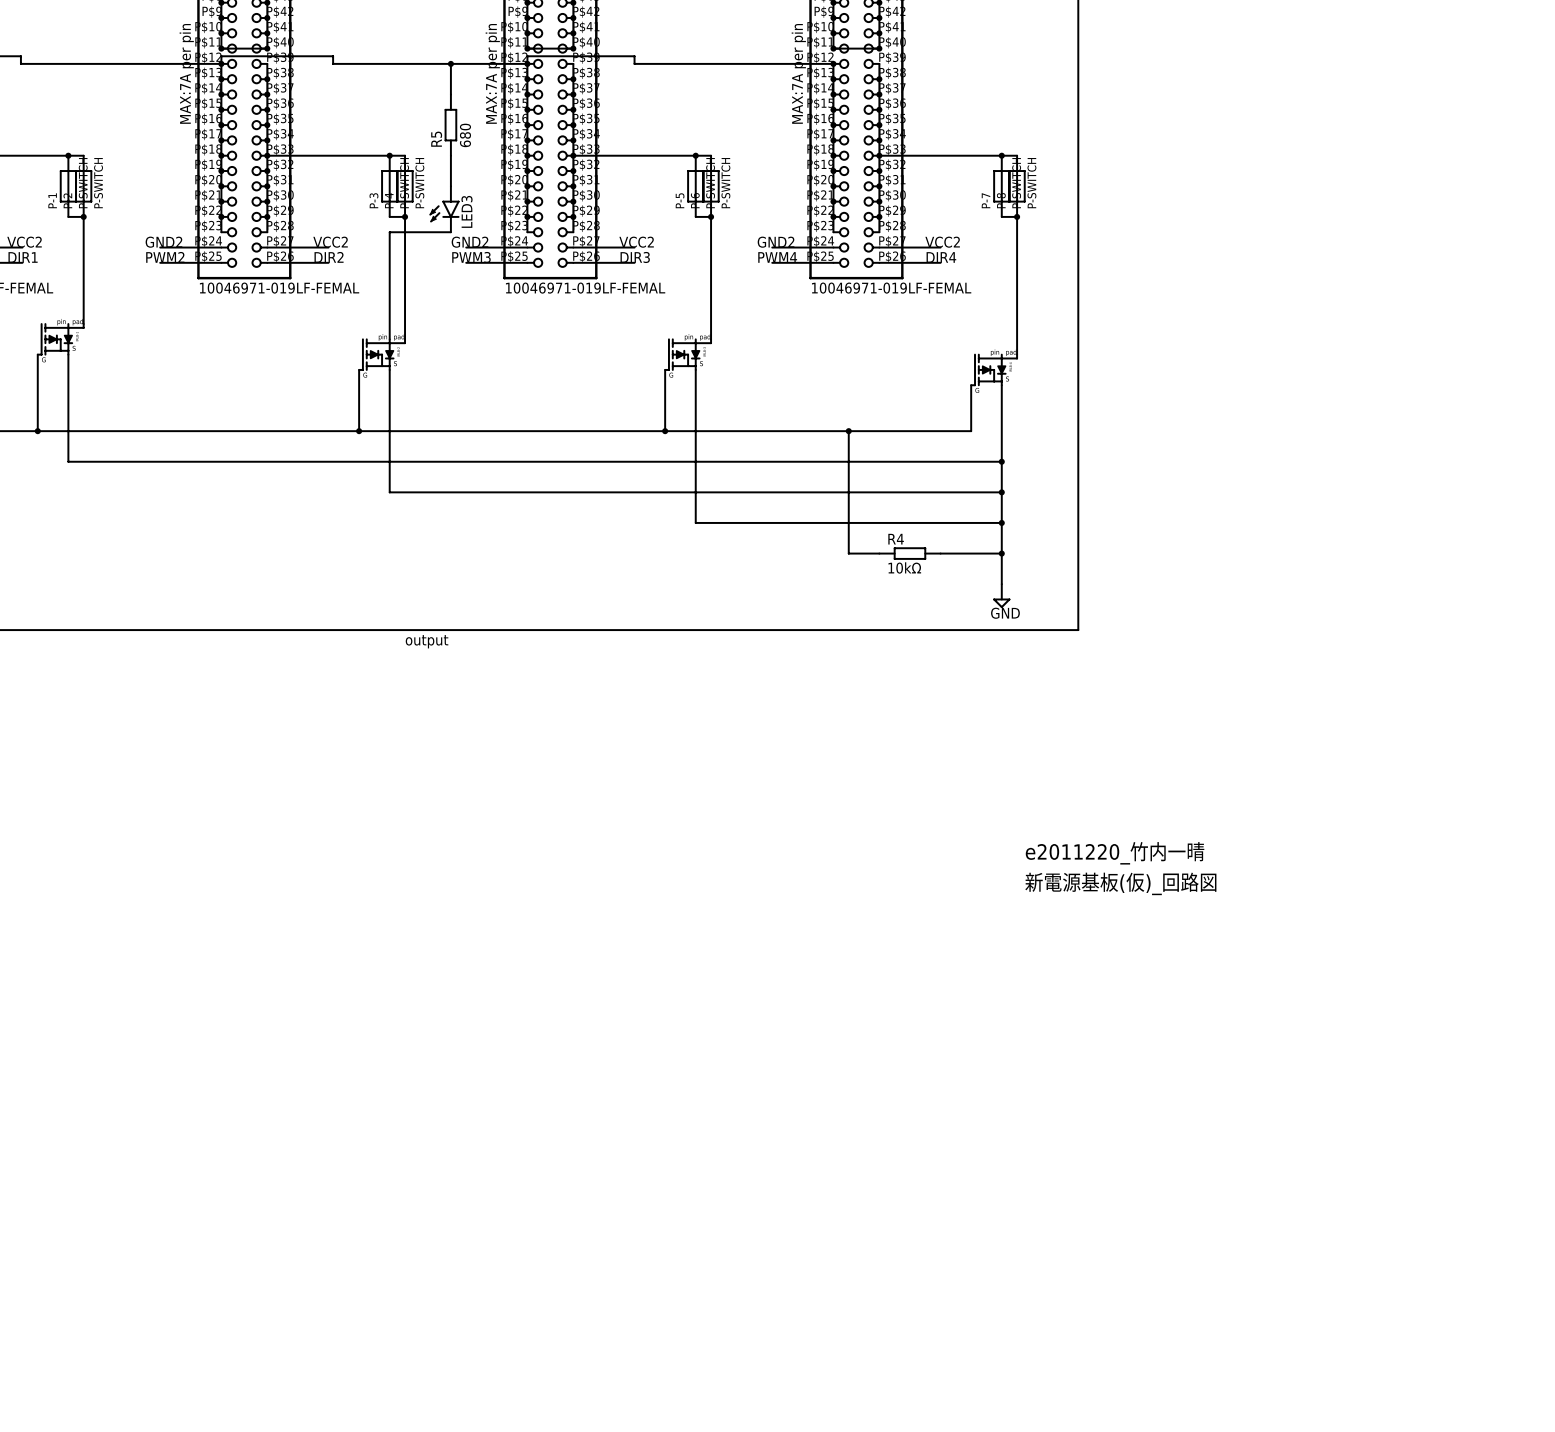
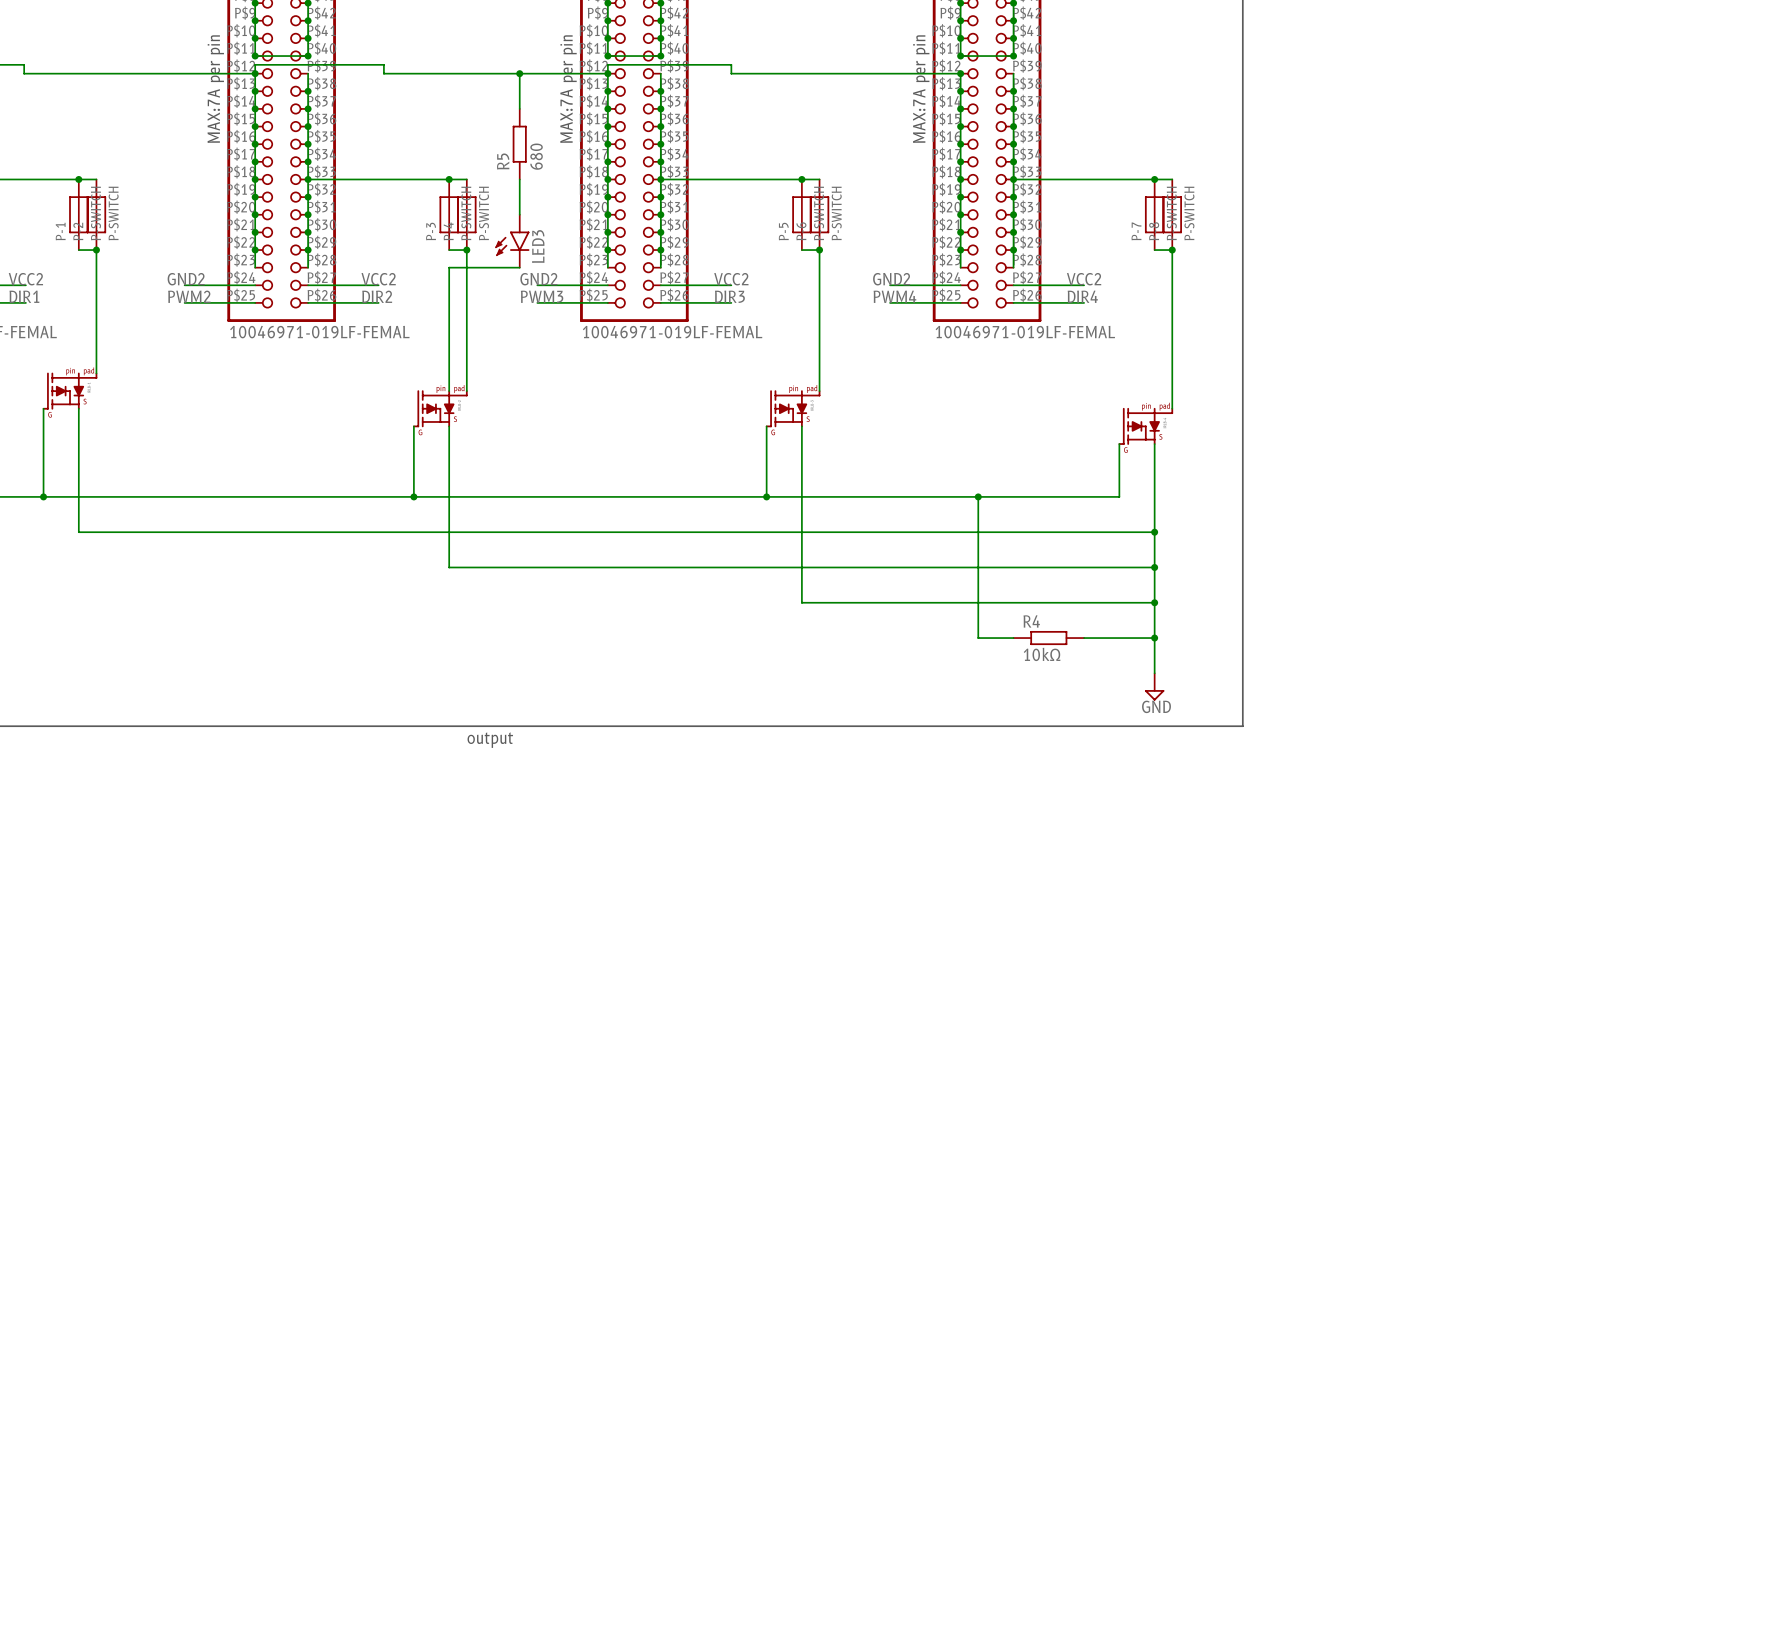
text: e2011220_竹内一晴 (1115, 853) -> none
text: 新電源基板(仮)_回路図 (1120, 883) -> none

